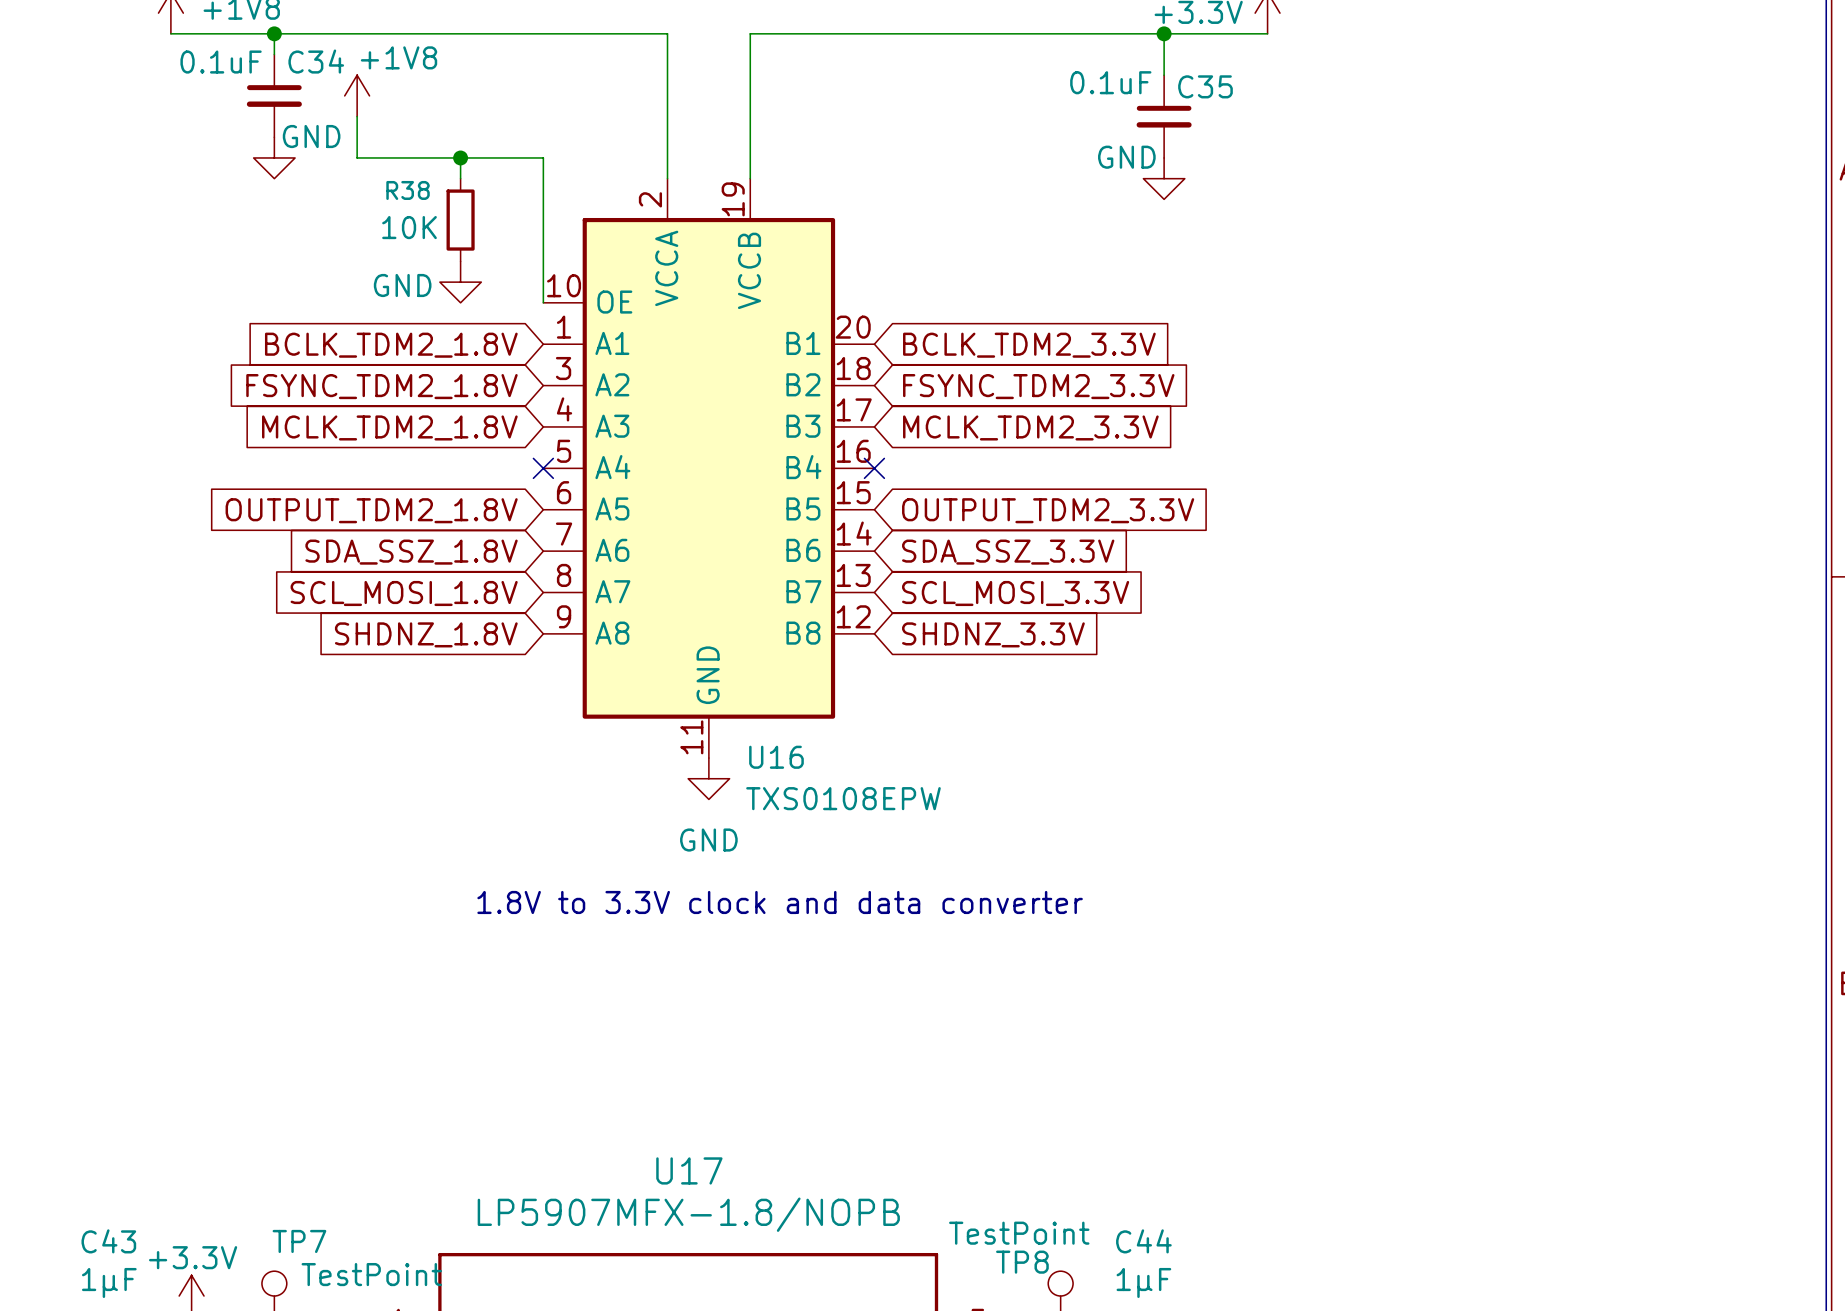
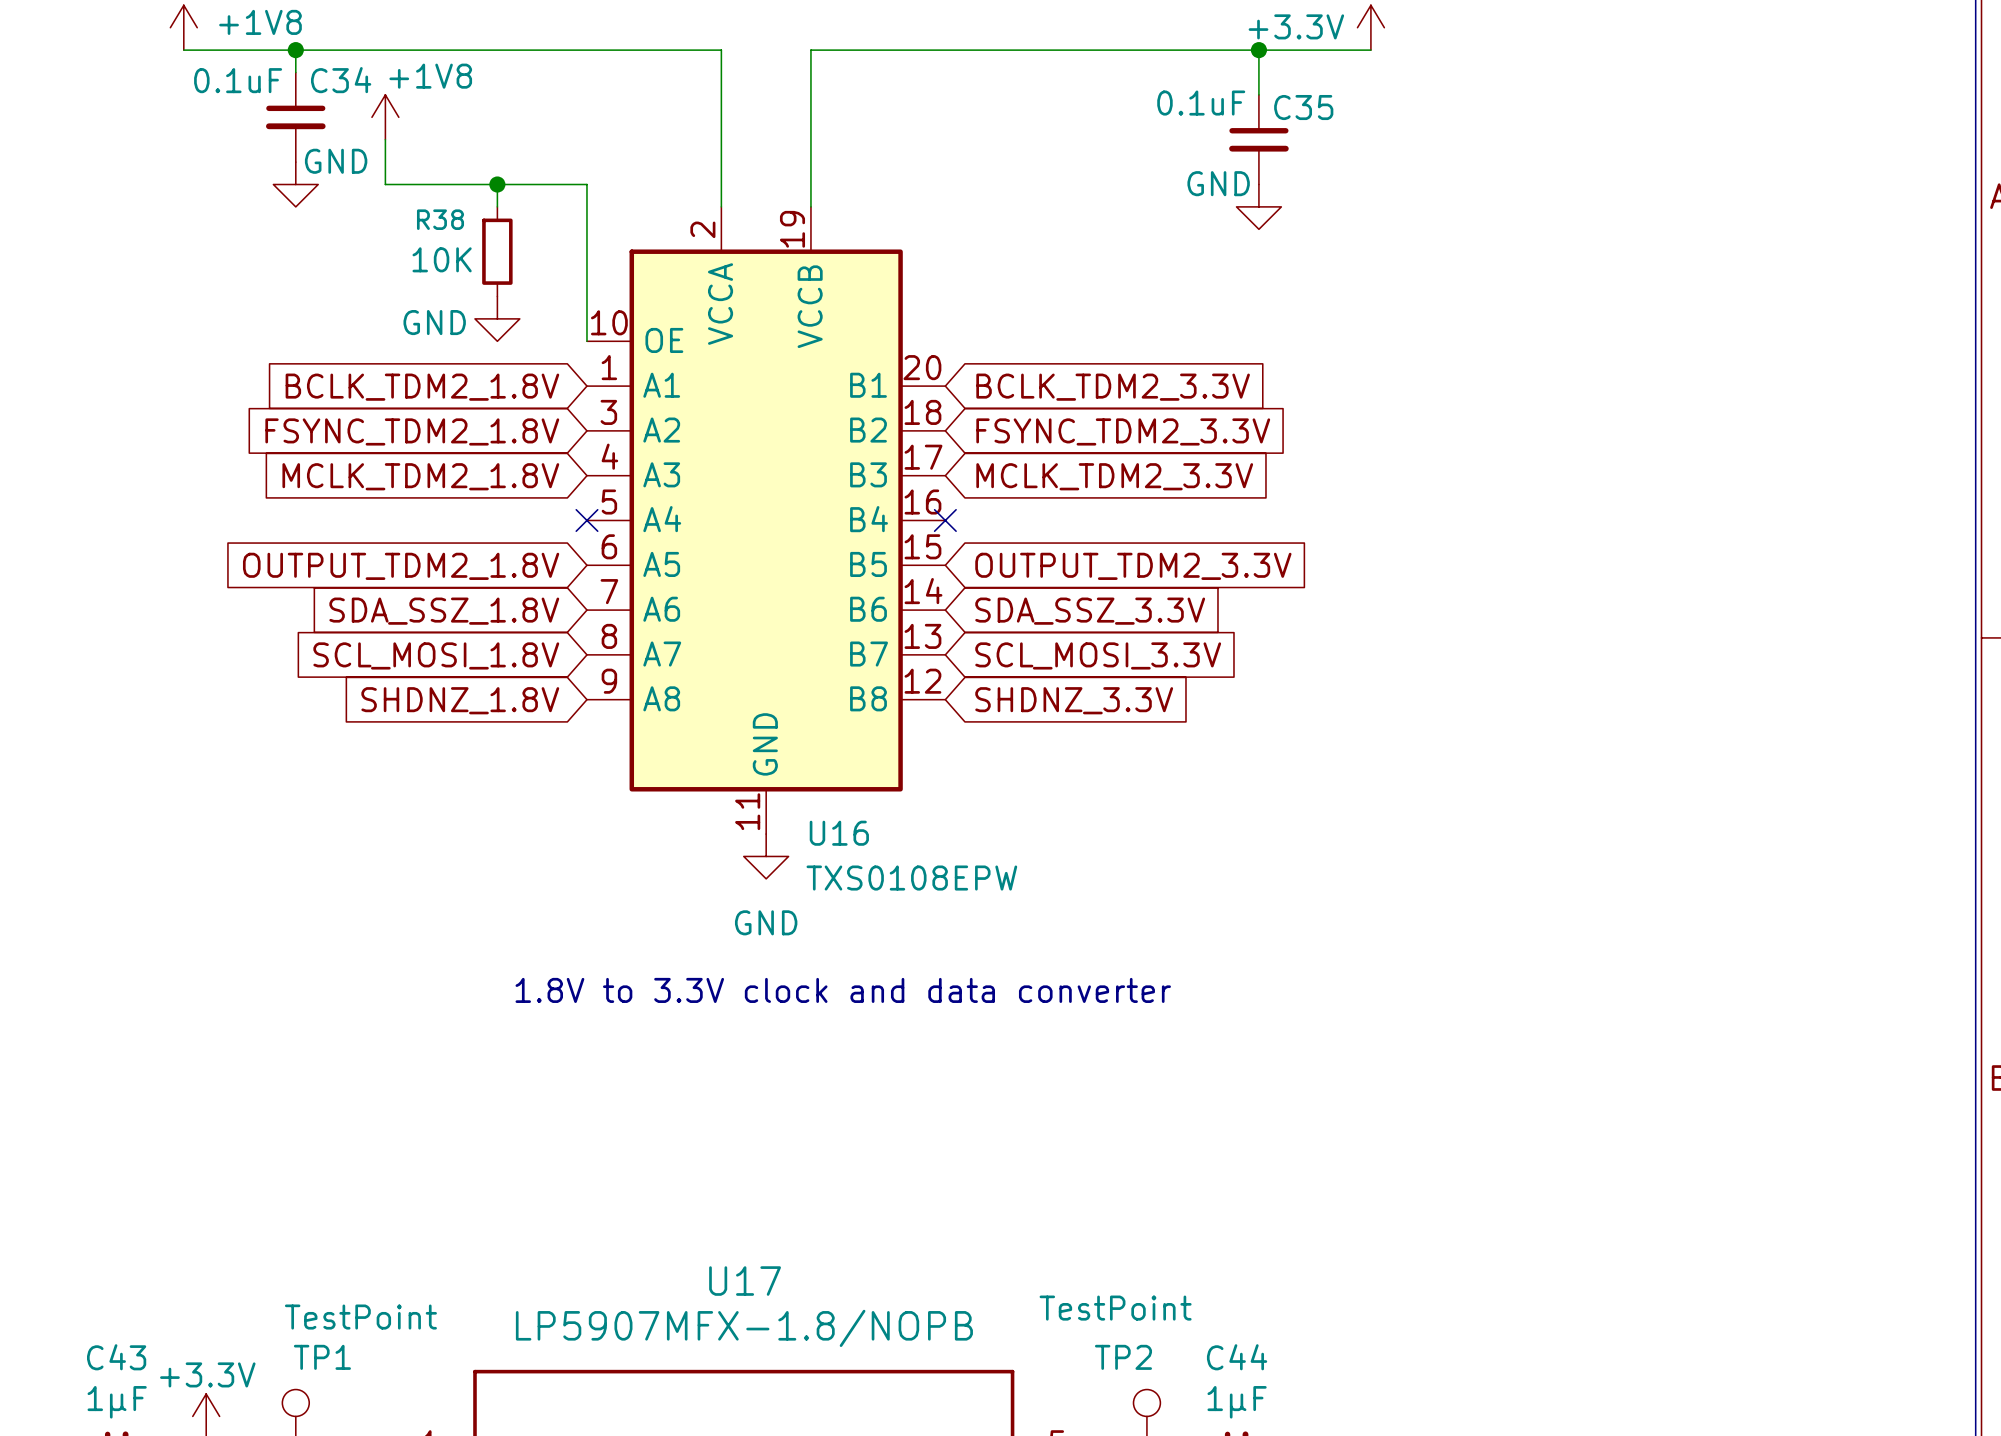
TP8 value position: TestPoint (1019, 1233) -> TestPoint (1115, 1308)
TP7 name: TP7 (299, 1241) -> TP1 (322, 1357)
TP8 name: TP8 (1022, 1262) -> TP2 (1123, 1357)
TP7 value position: TestPoint (371, 1274) -> TestPoint (360, 1317)

